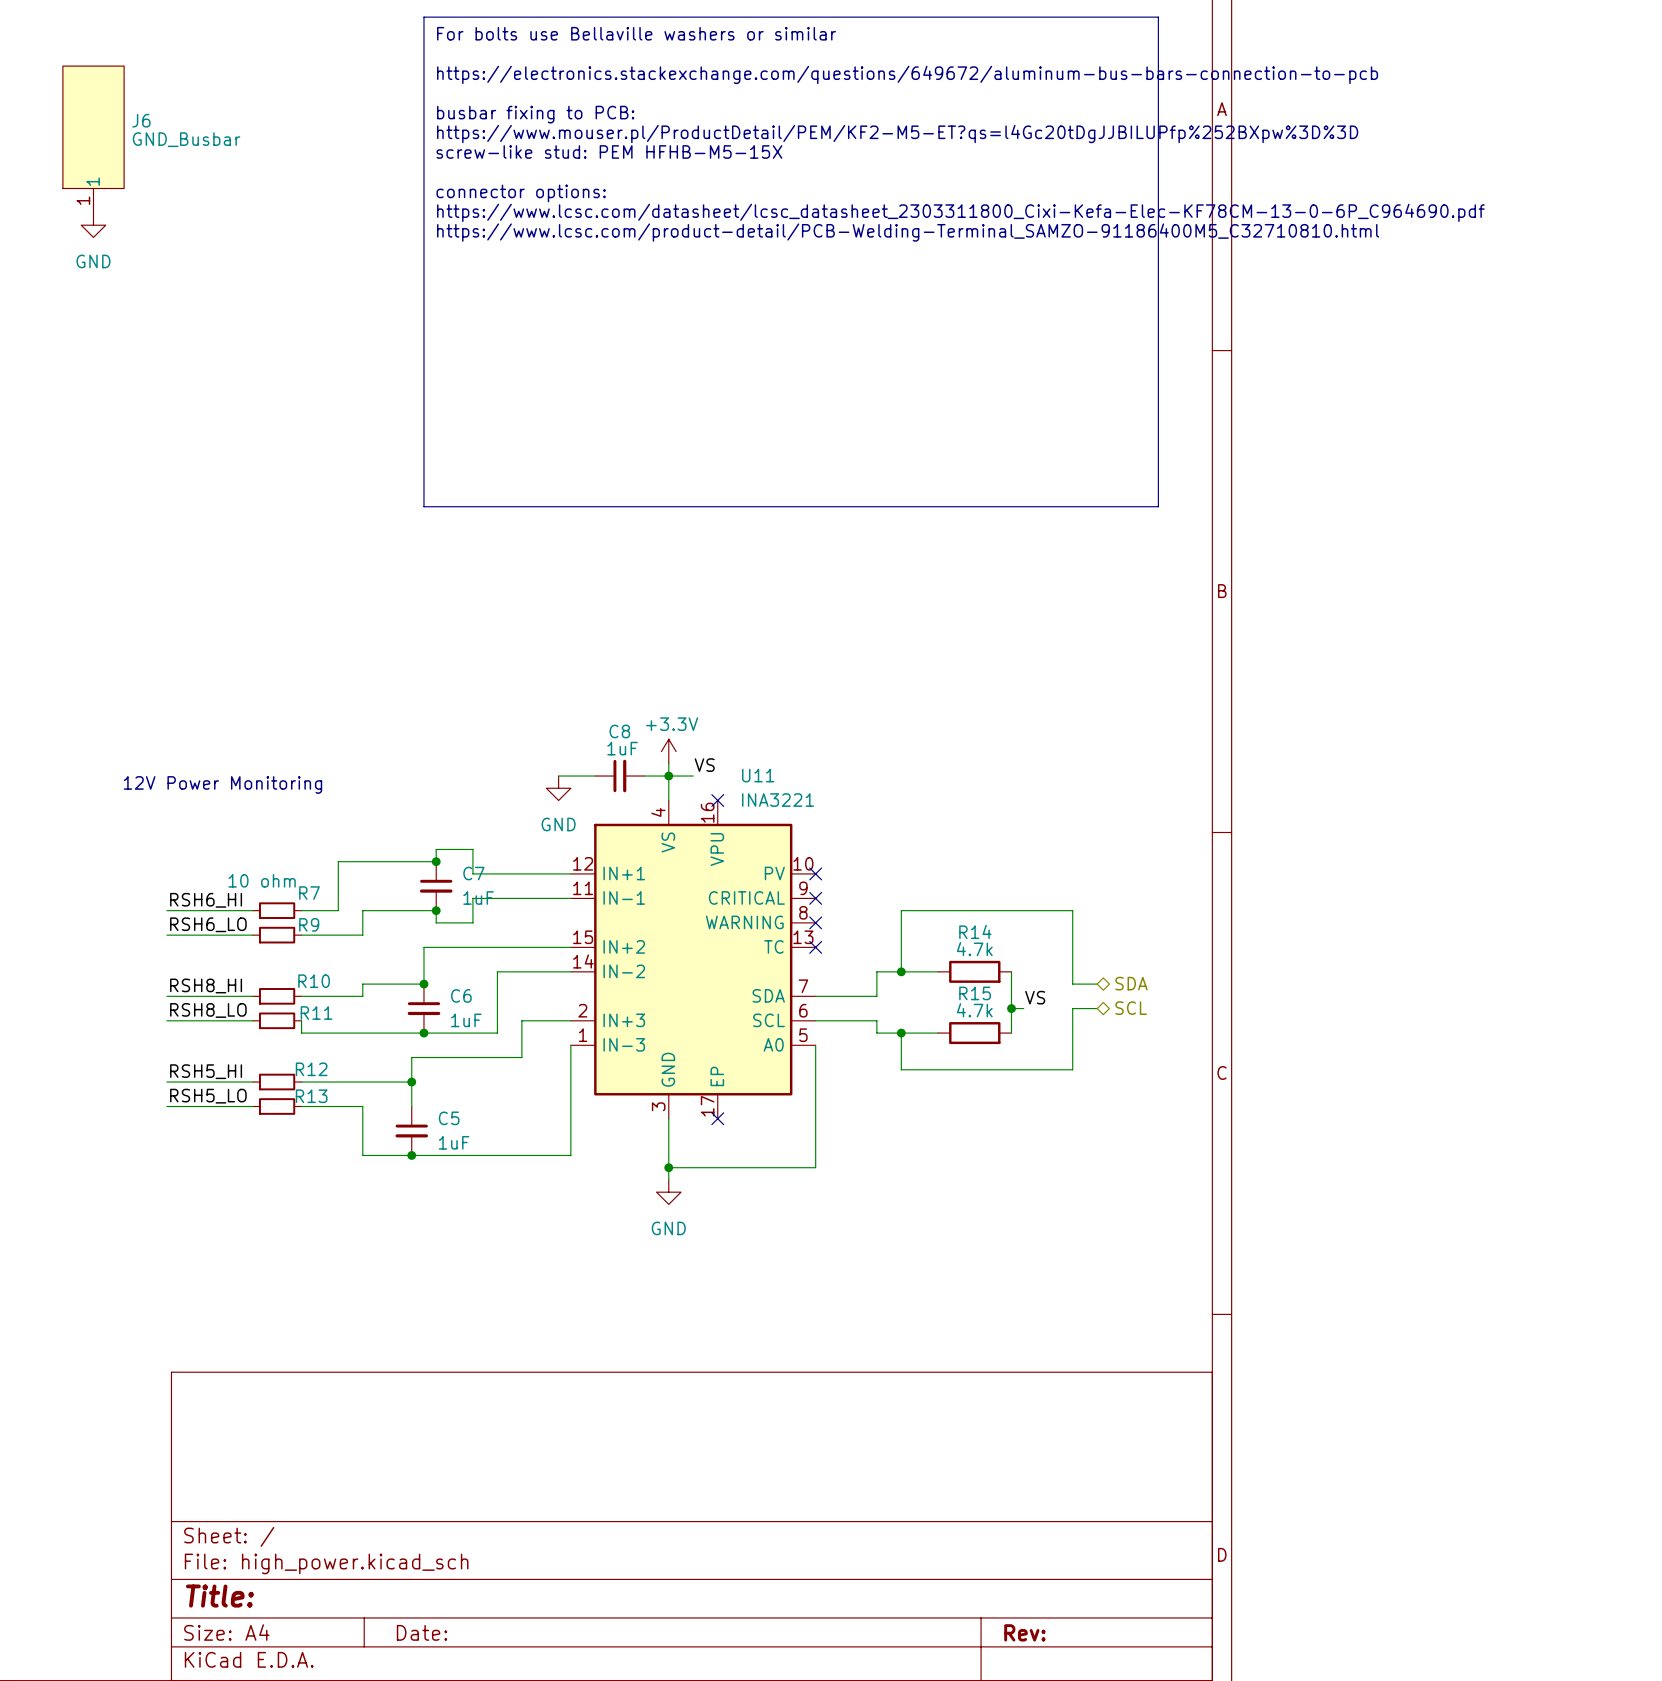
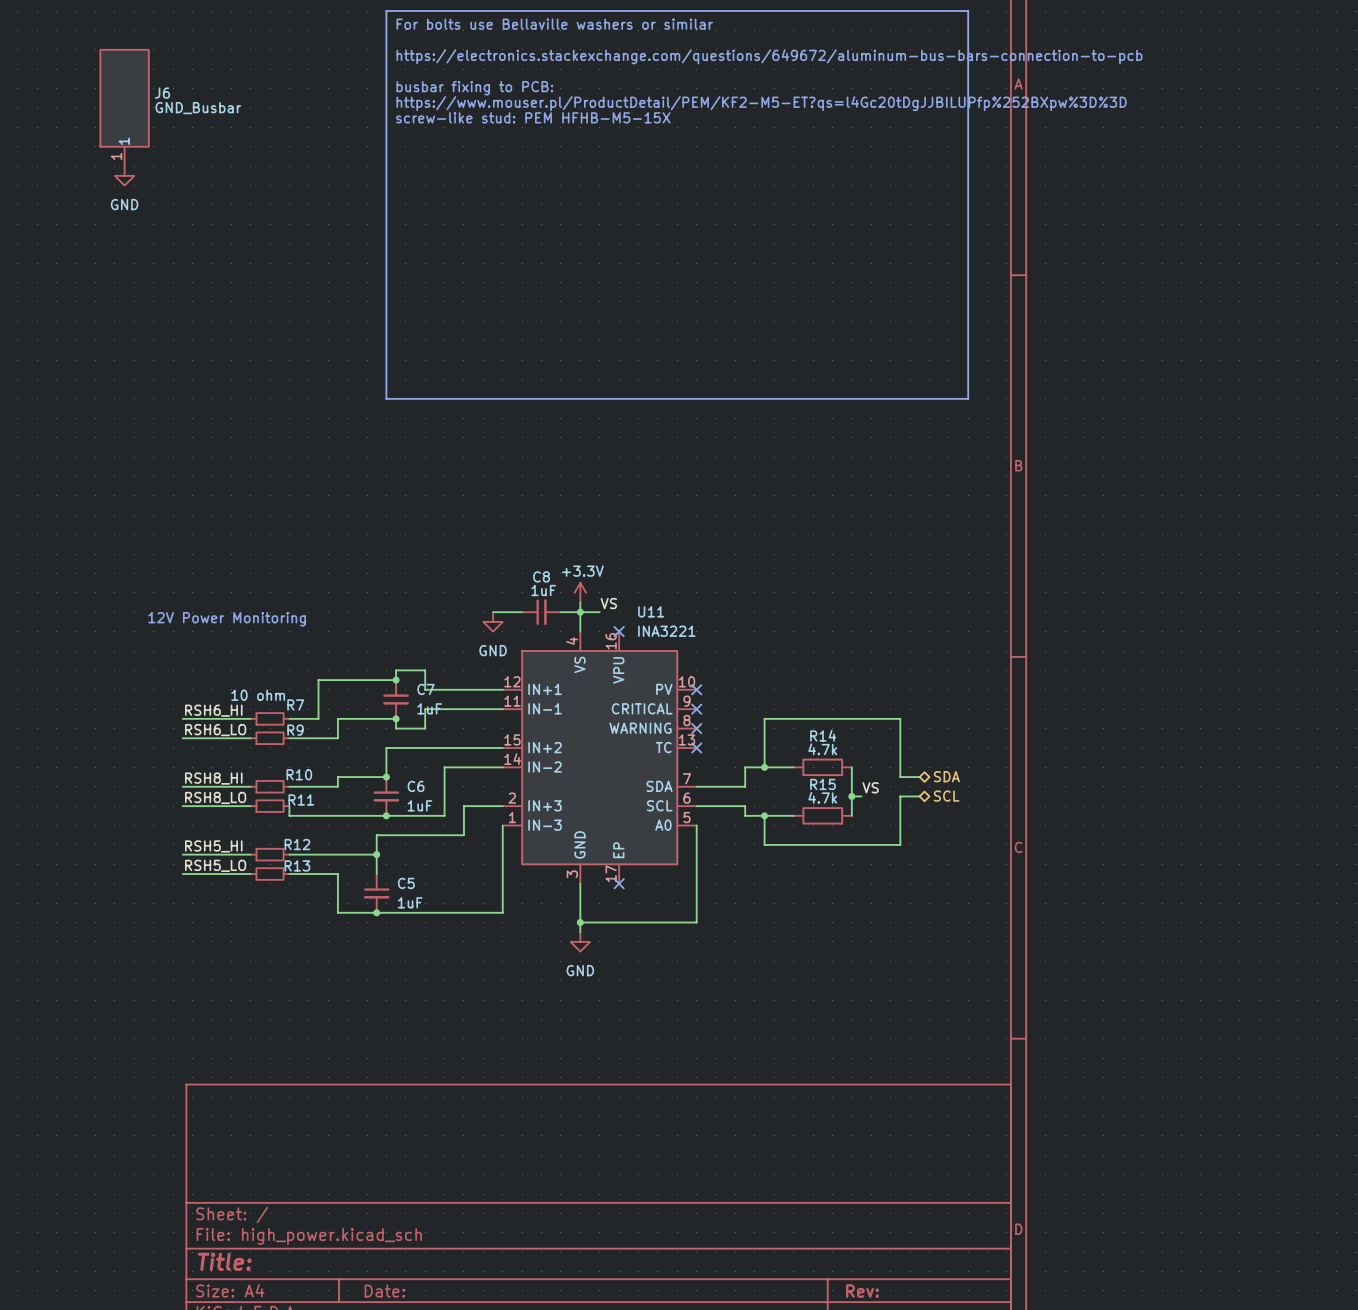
text: connector options: (521, 193) -> none
text: https://www.lcsc.com/datasheet/lcsc_datasheet_2303311800_Cixi-Kefa-Elec-KF78CM-13-0-6P_C964690.pdf (960, 212) -> none
text: https://www.lcsc.com/product-detail/PCB-Welding-Terminal_SAMZO-91186400M5_C32710810.html (908, 232) -> none

